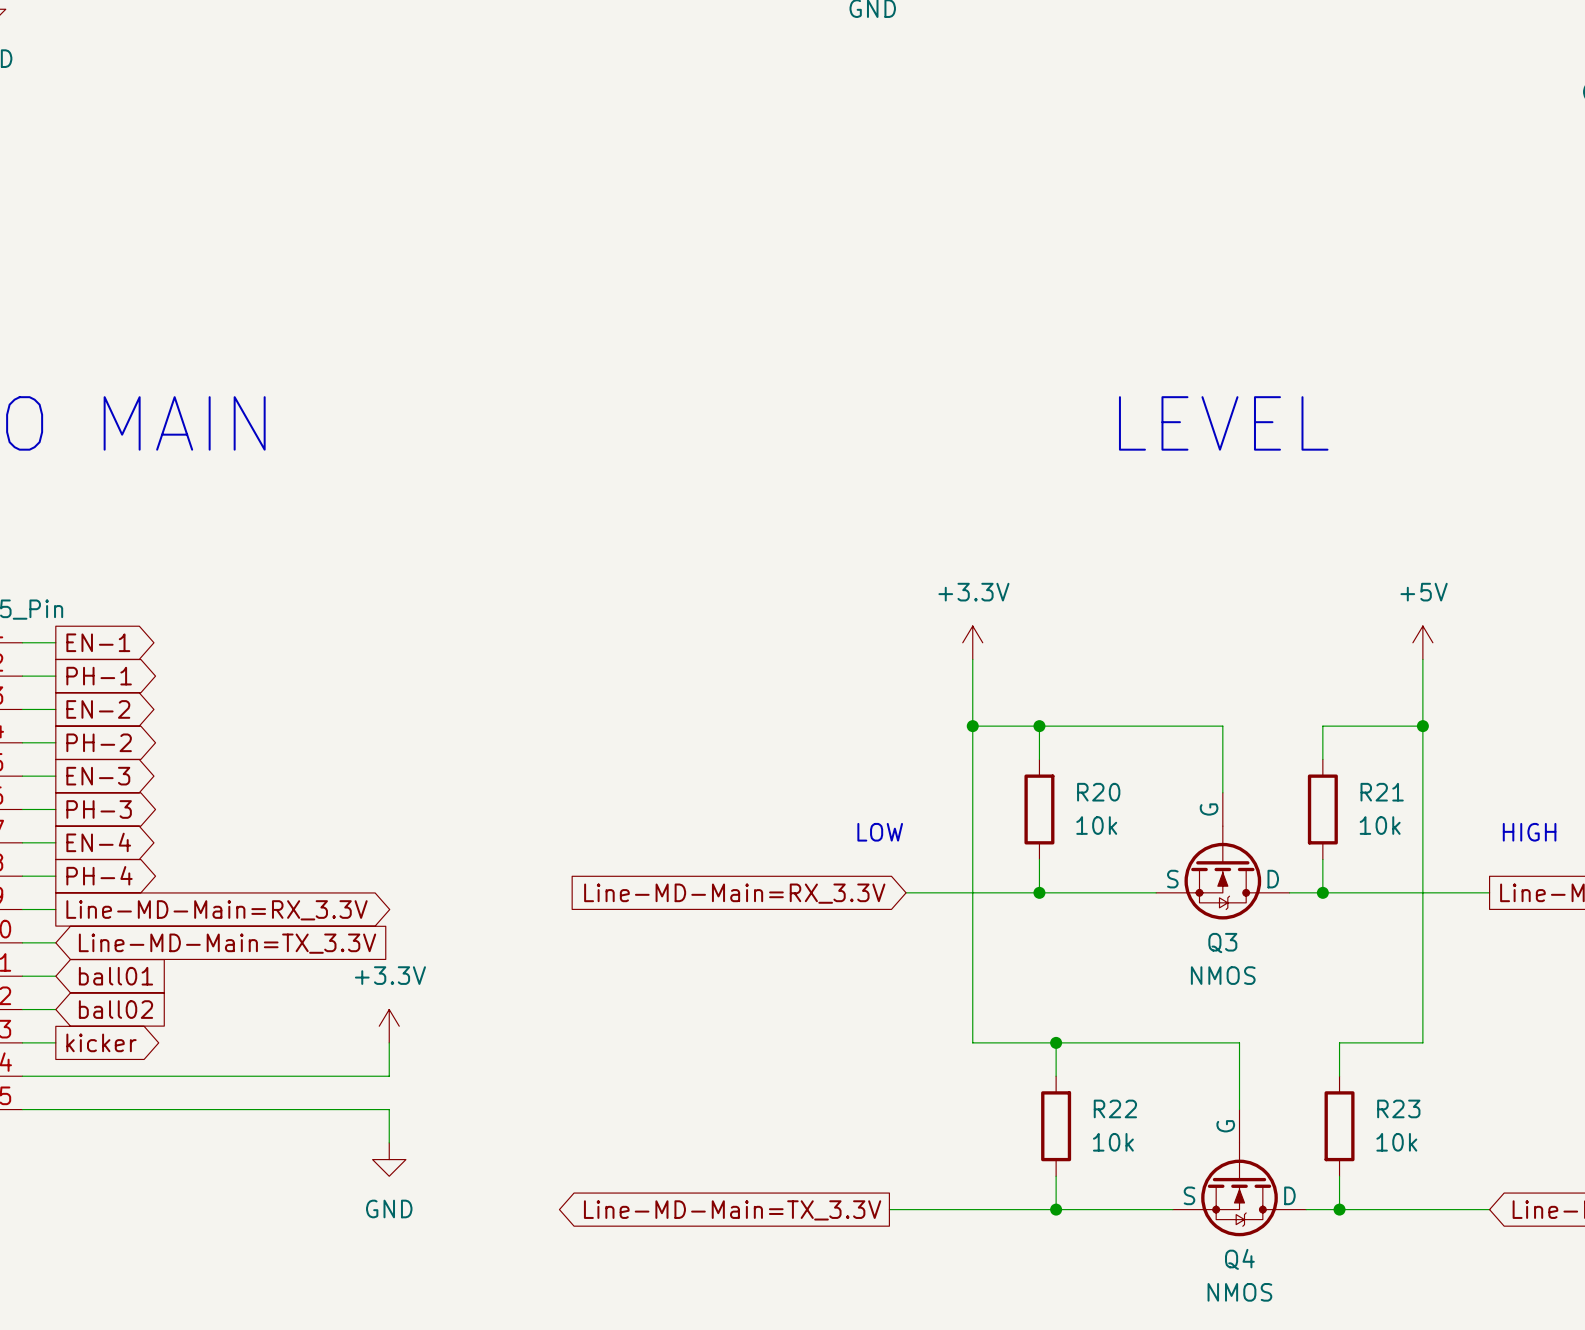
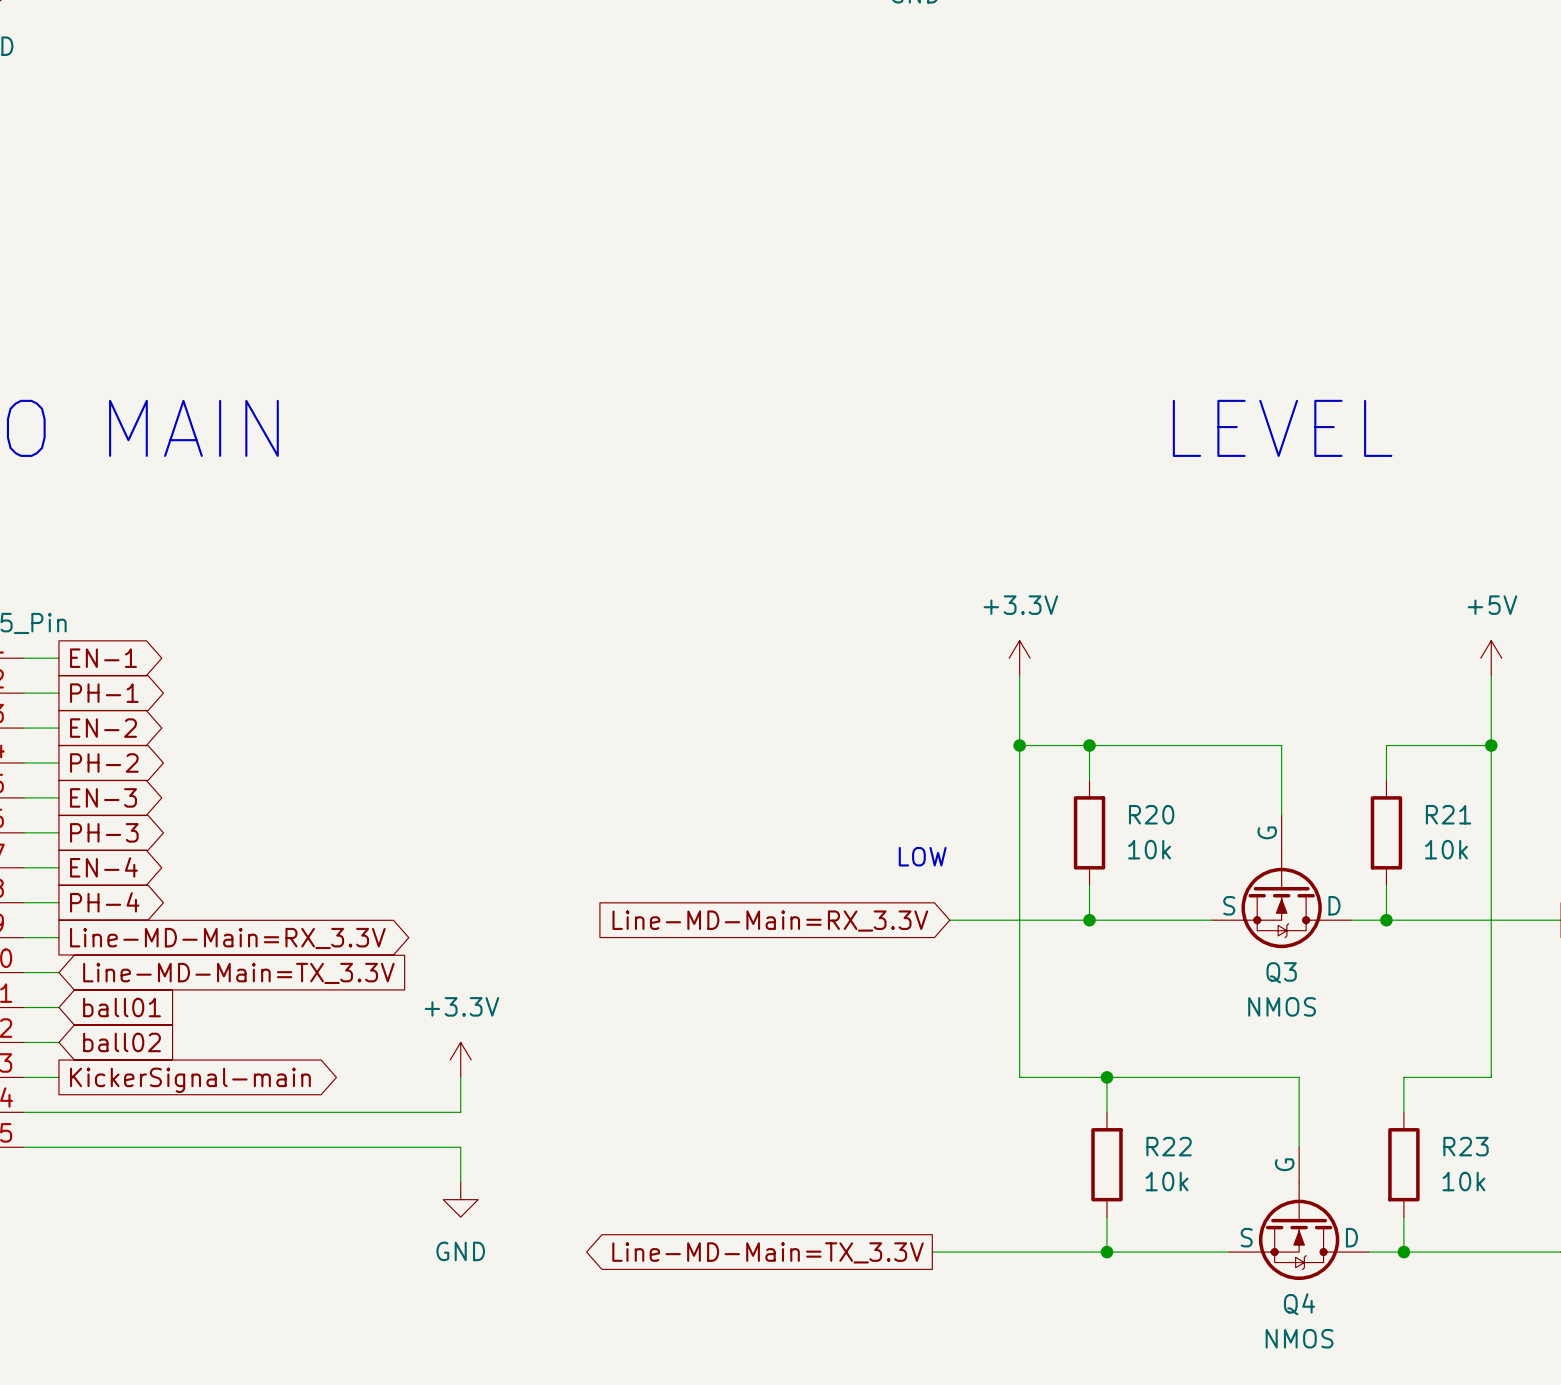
power symbol position: +3.3V (389, 1026) -> +3.3V (460, 1059)
global label: kicker (101, 1042) -> KickerSignal-main (190, 1080)
wire: (389, 1042) (389, 1076) -> (460, 1077) (460, 1112) (408, 1112)
wire: (389, 1109) (389, 1142) -> (408, 1147) (460, 1147) (460, 1182)
power symbol position: GND (389, 1159) -> GND (460, 1199)

